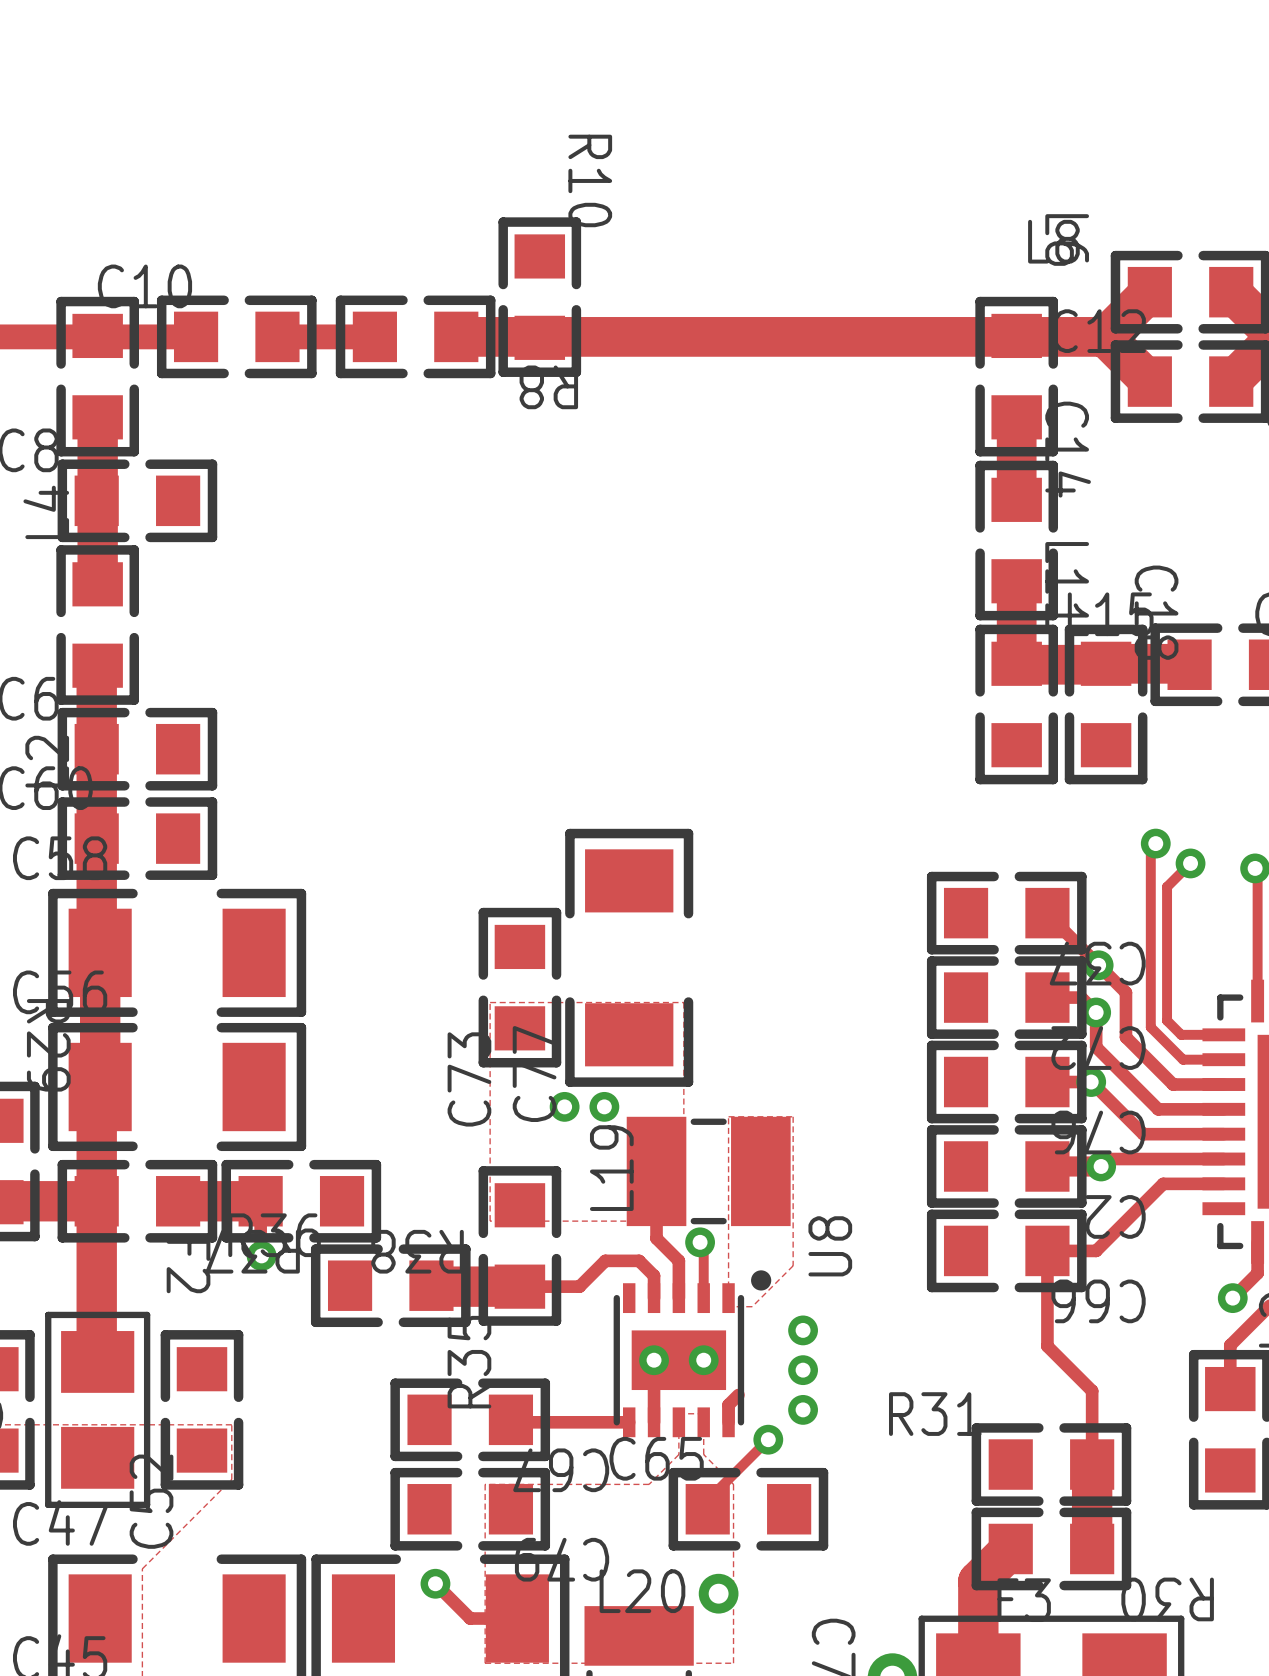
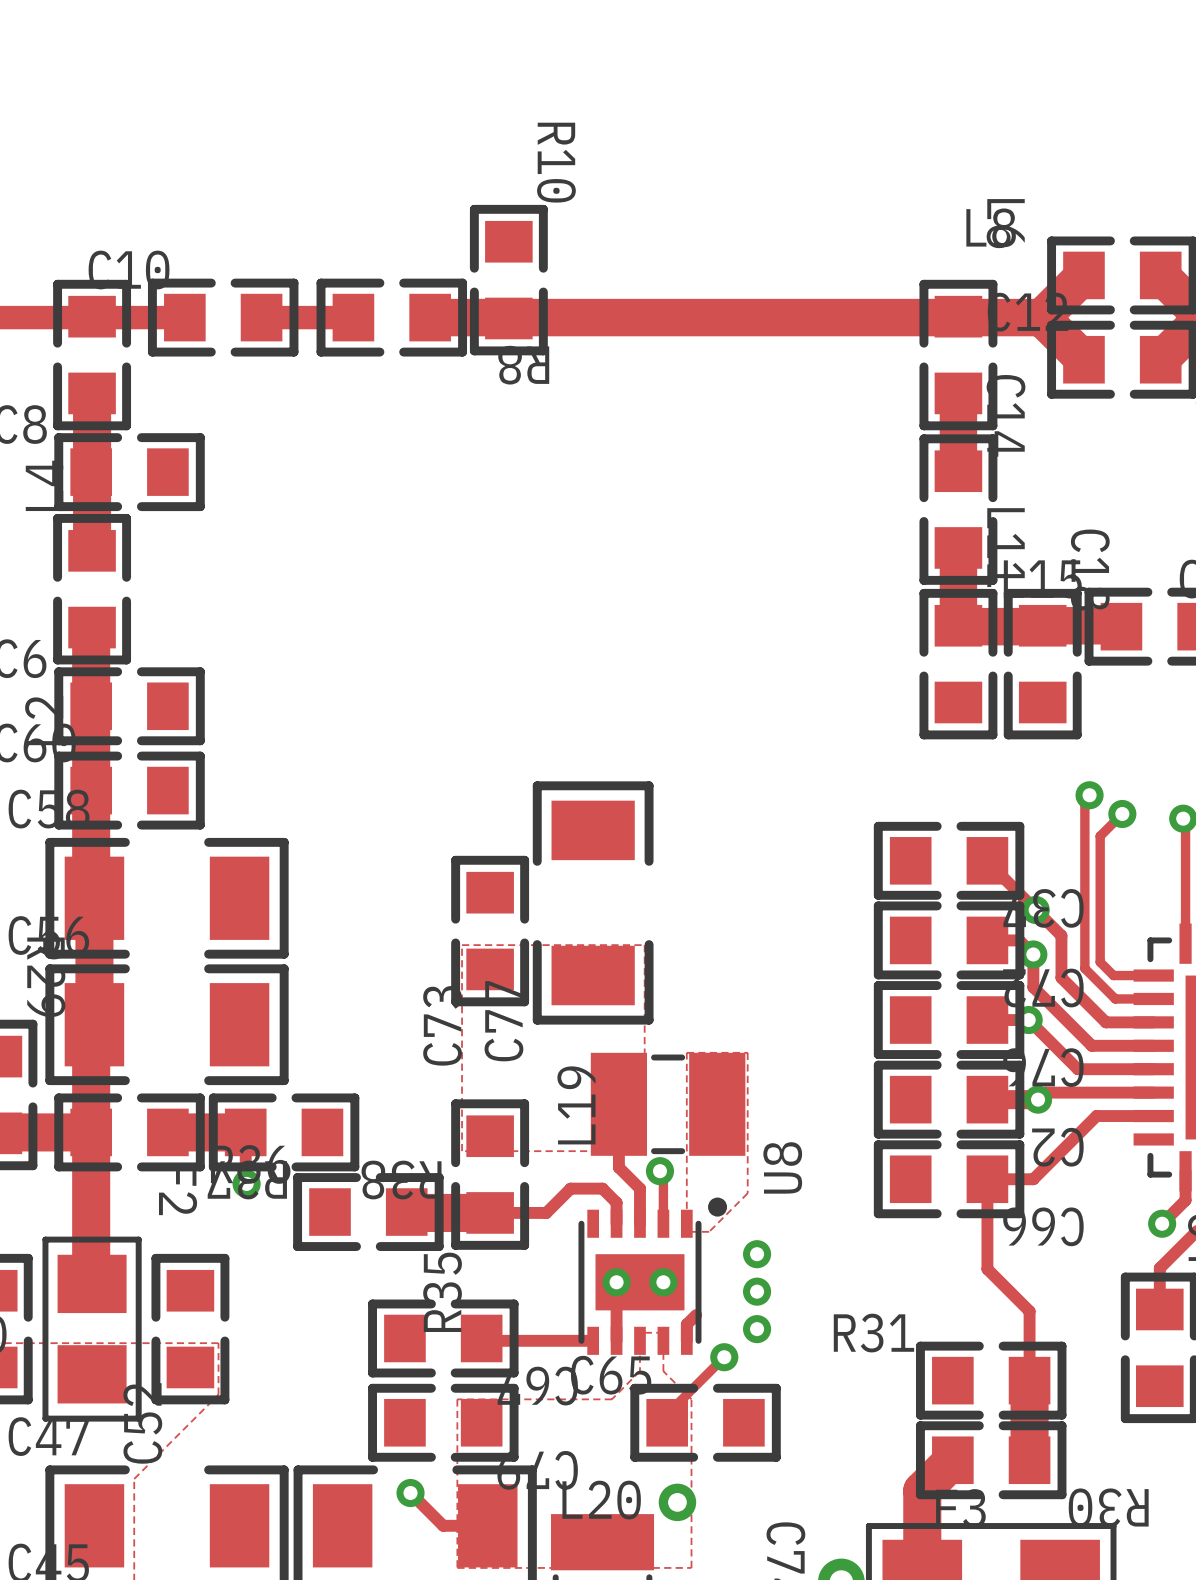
via: (564, 1106) -> none
via: (604, 1106) -> none

